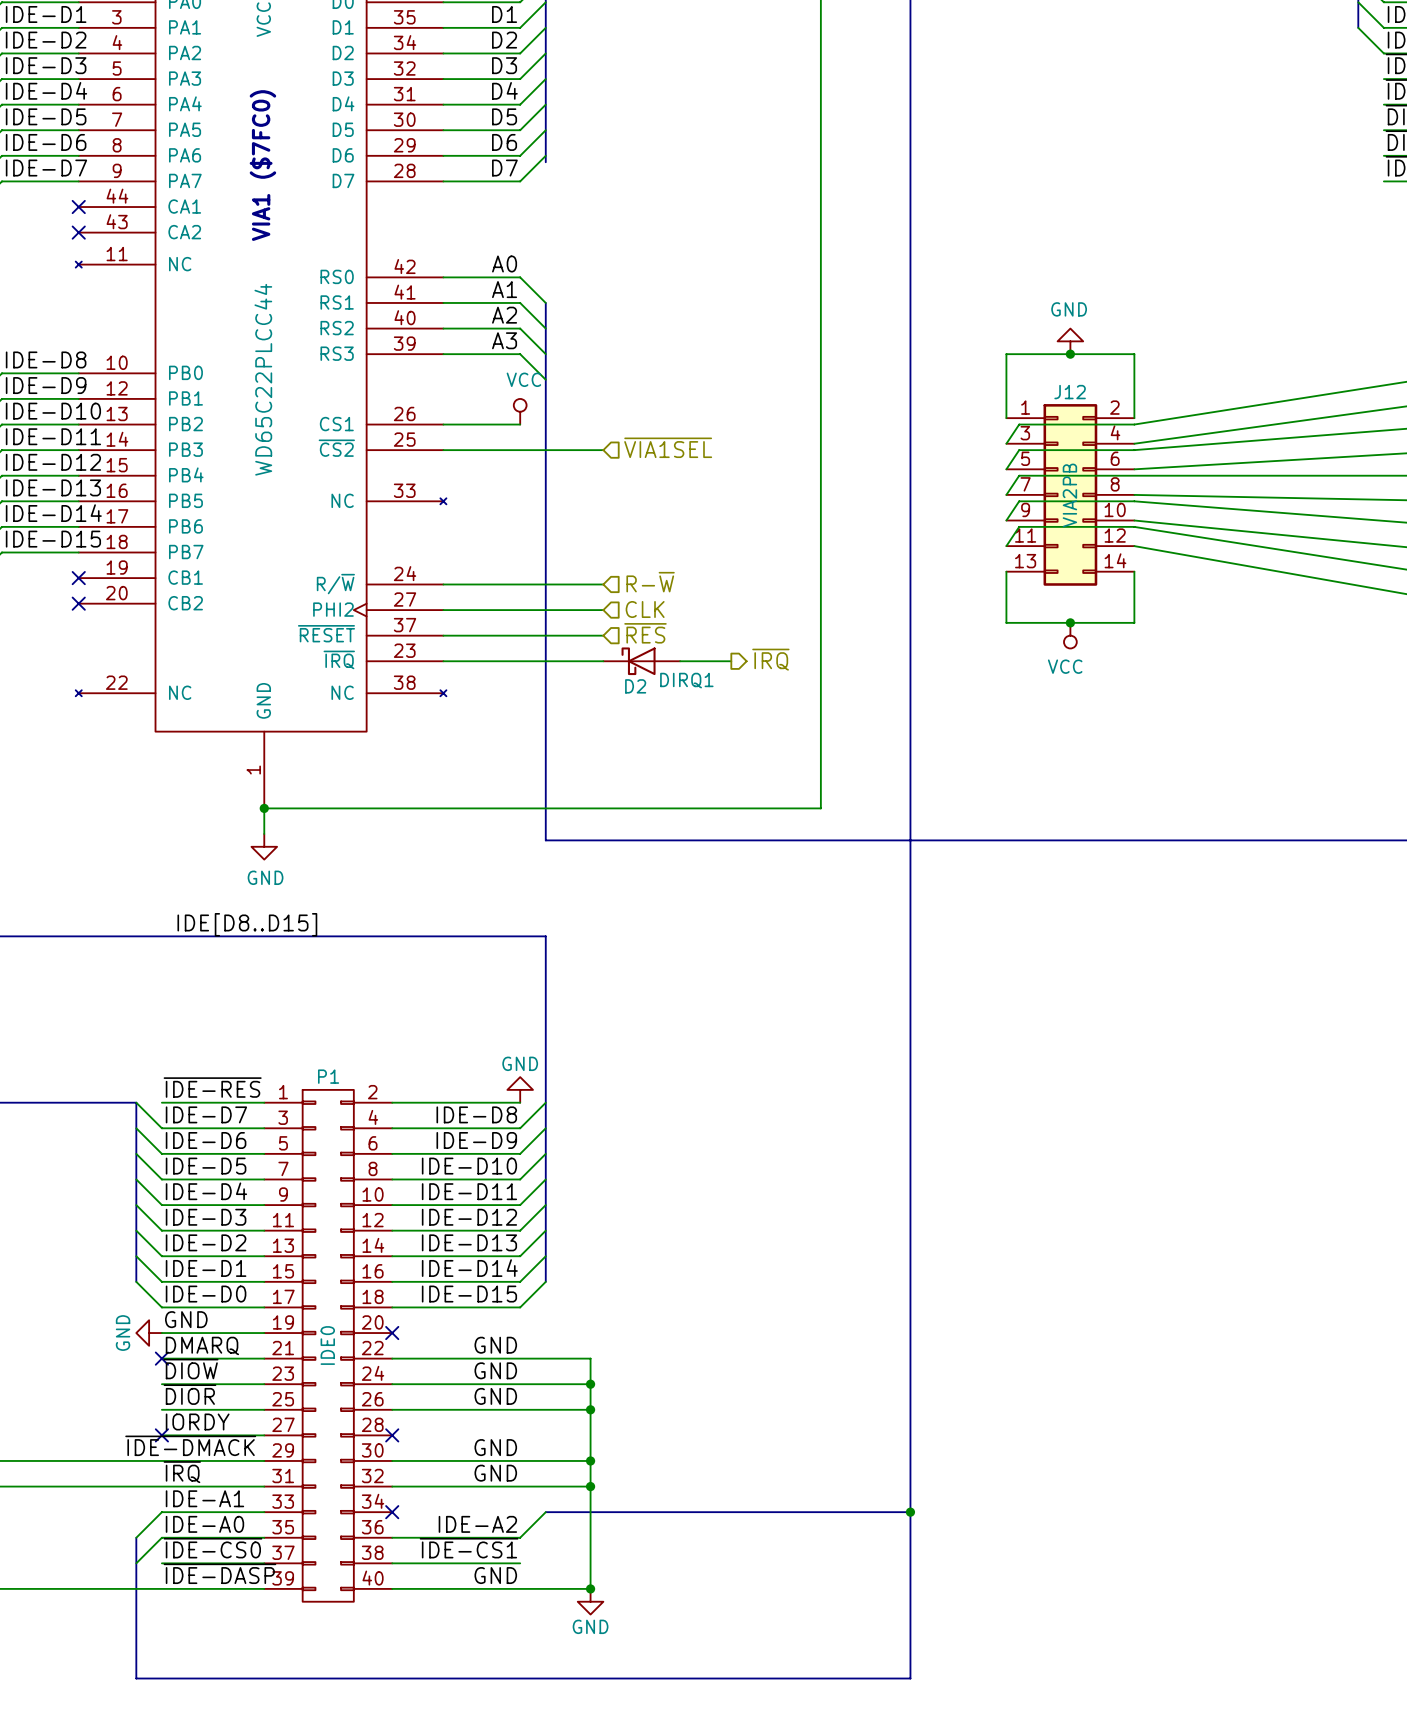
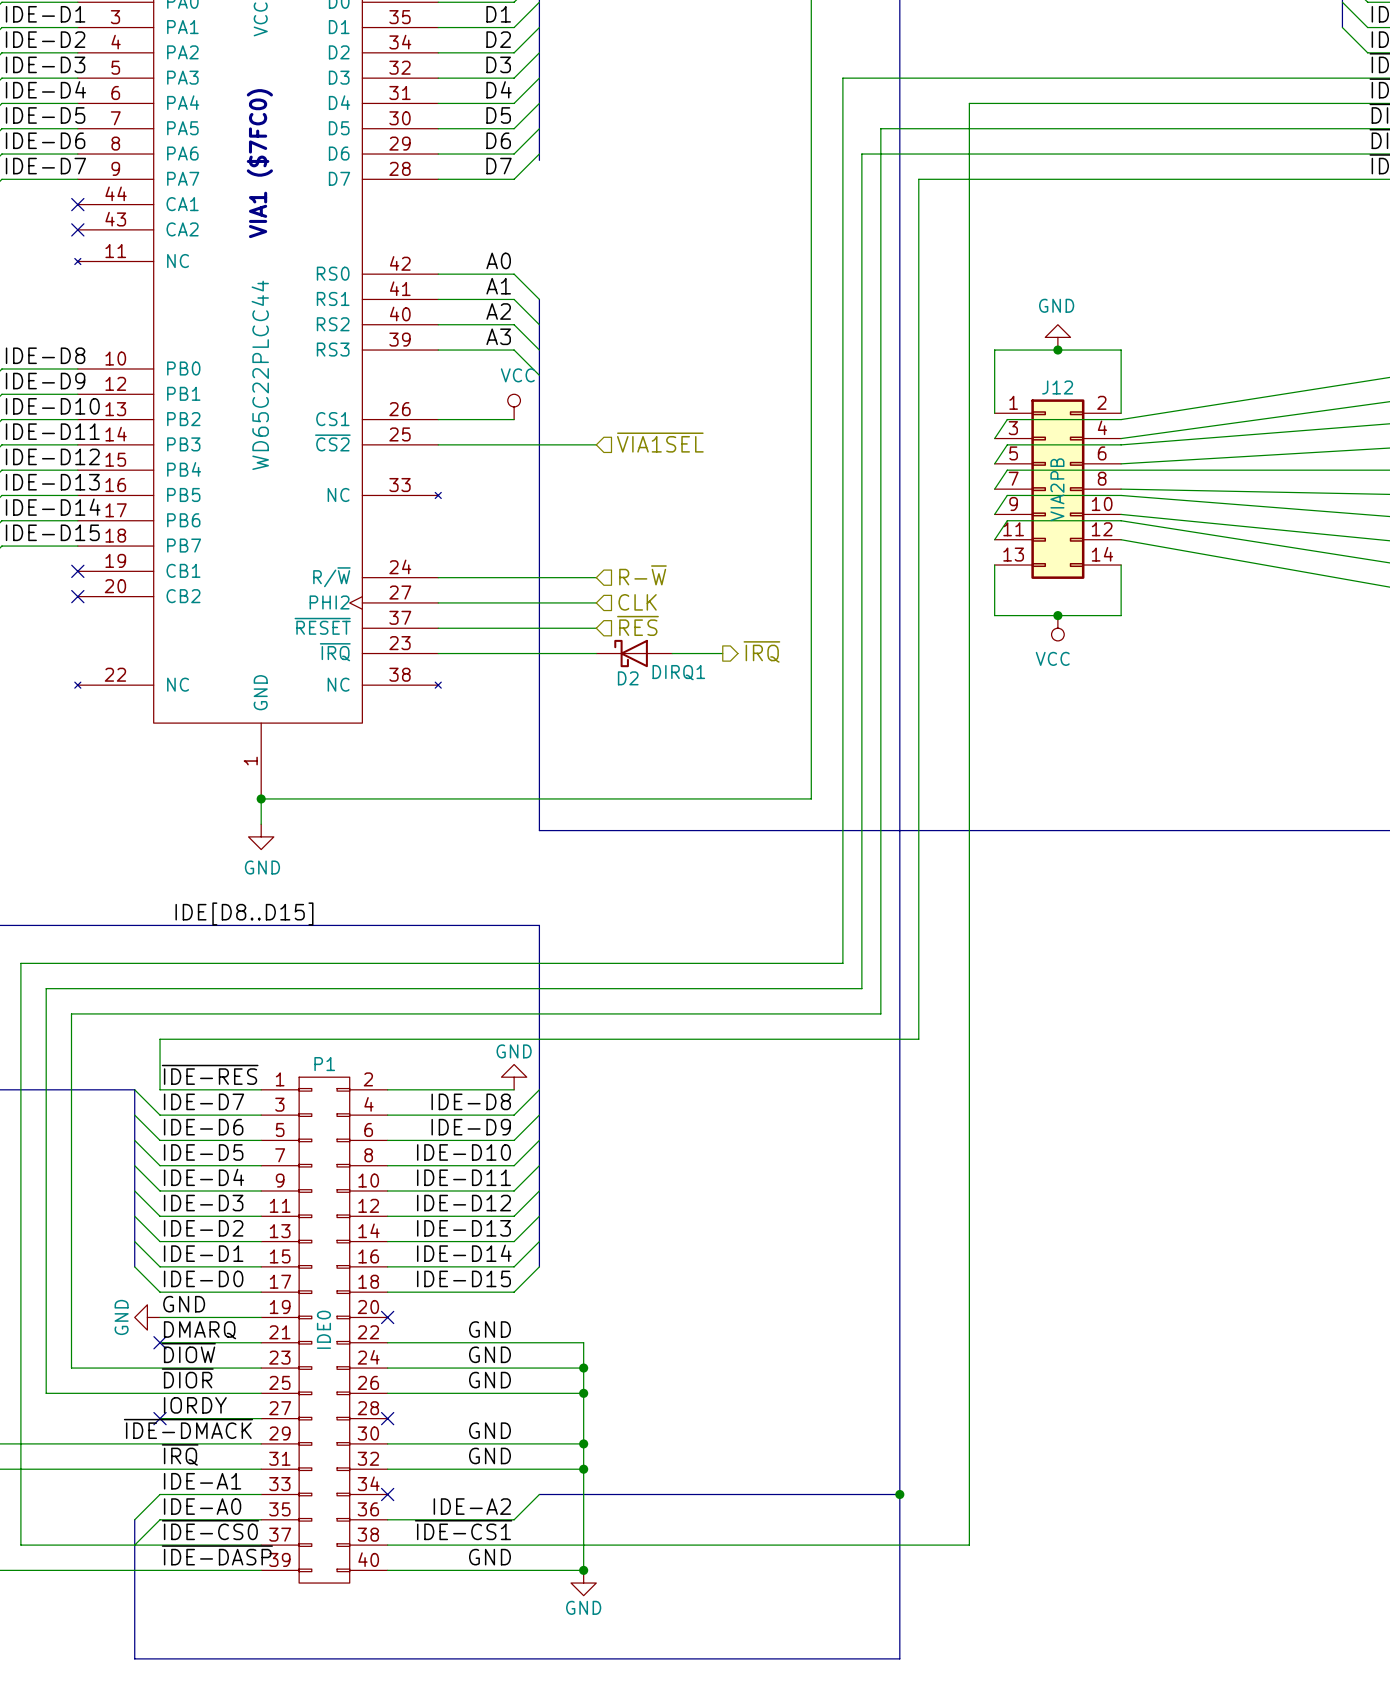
wire: none -> (1367, 78) (842, 78) (842, 963) (20, 963) (20, 1545) (160, 1545)
wire: none -> (1367, 103) (969, 103) (969, 1545) (514, 1545)
wire: none -> (1367, 128) (880, 128) (880, 1013) (71, 1013) (71, 1368) (160, 1368)
wire: none -> (1367, 154) (861, 154) (861, 988) (46, 988) (46, 1393) (160, 1393)
wire: none -> (1367, 179) (918, 179) (918, 1039) (160, 1039) (160, 1089)

